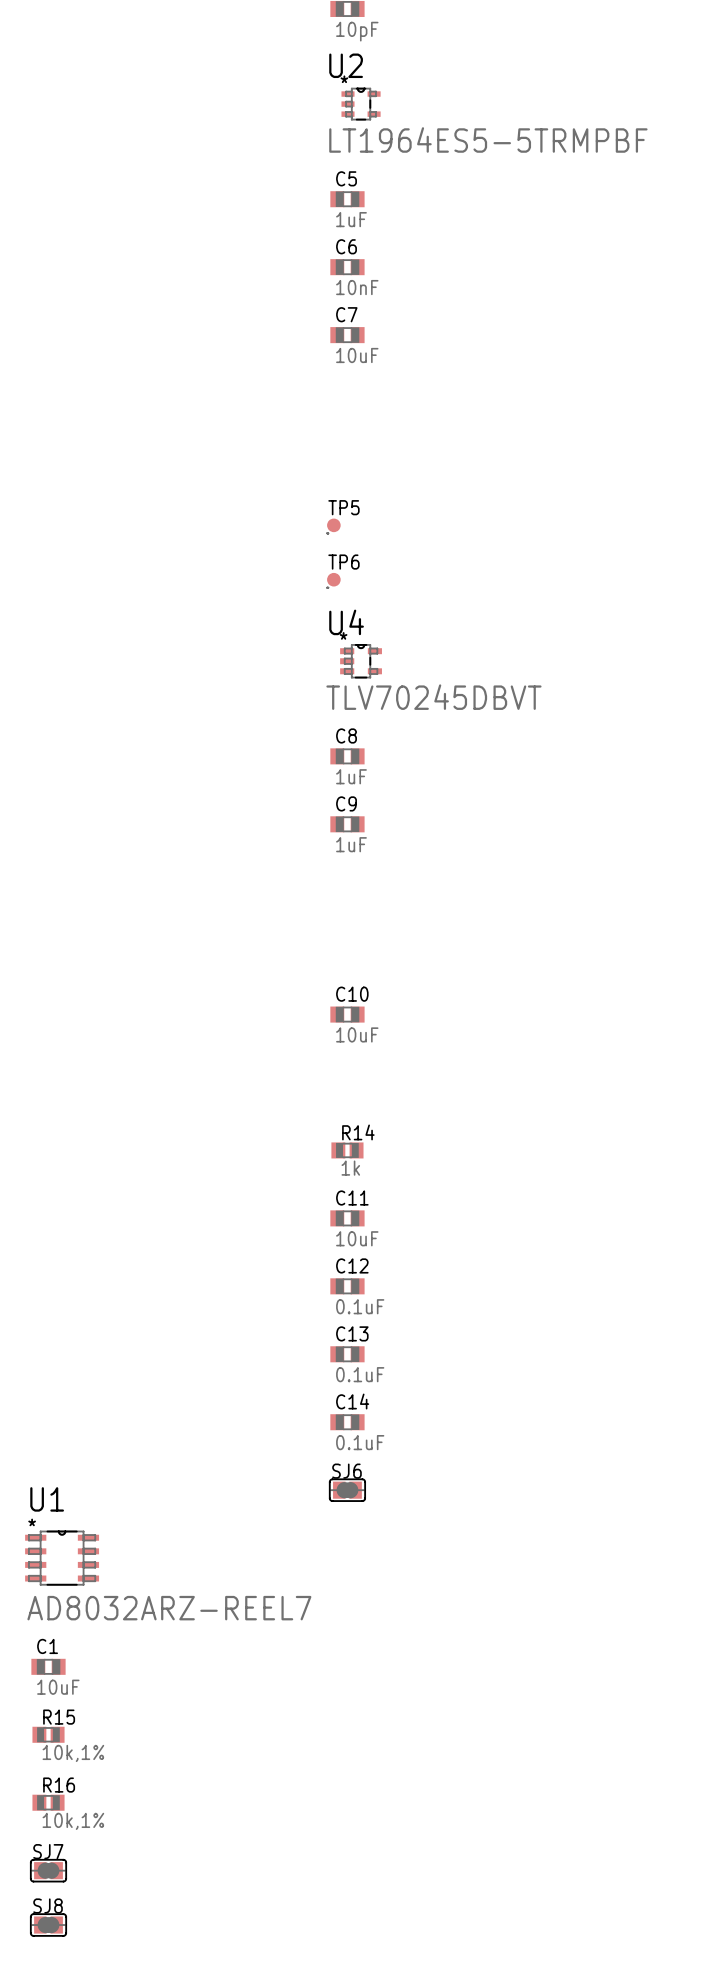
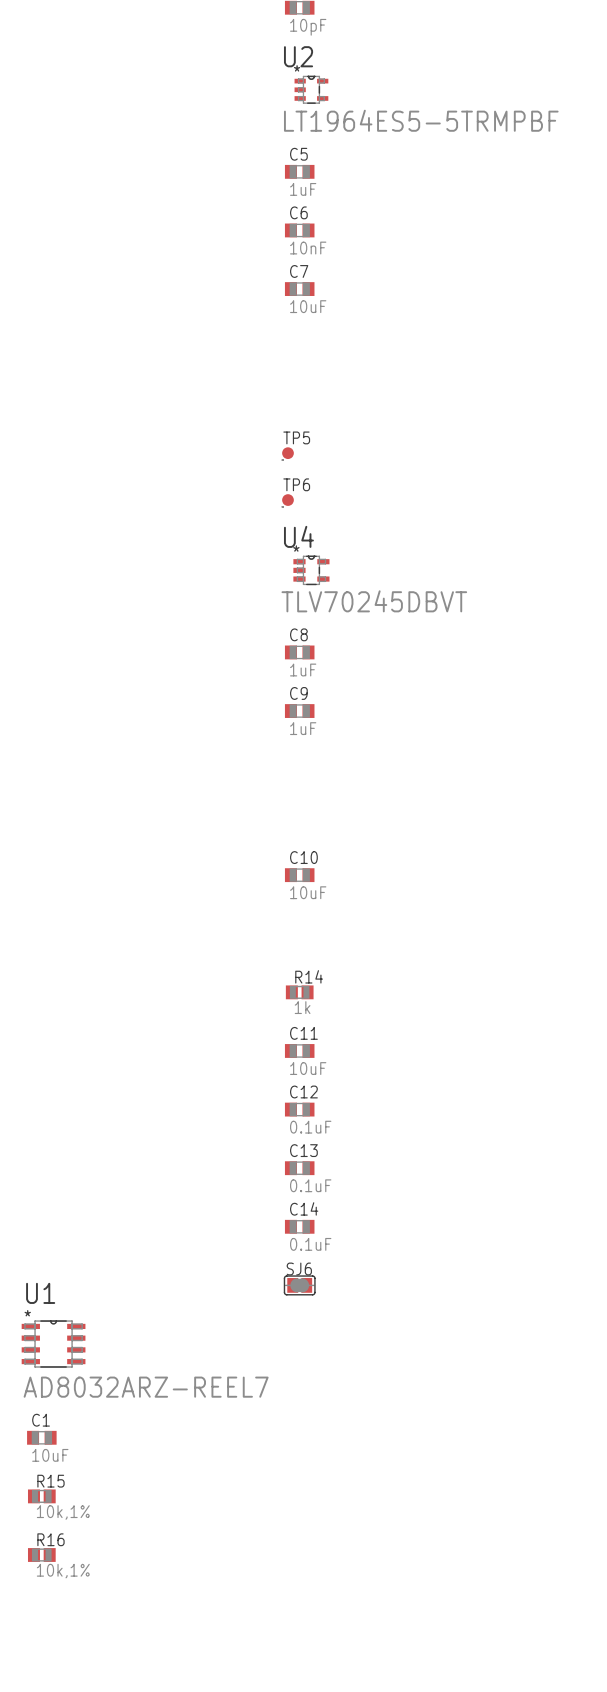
SJ7: (48, 1870) -> none
SJ8: (48, 1925) -> none

